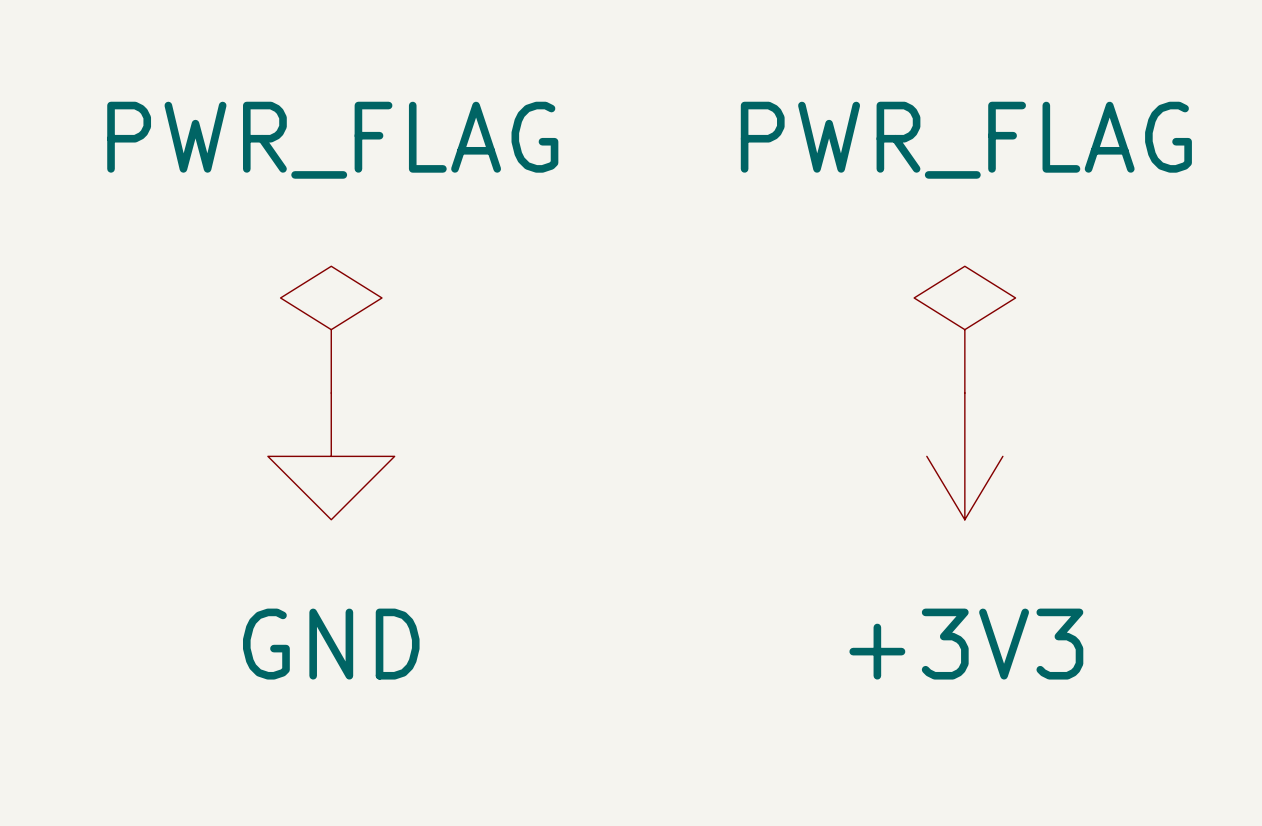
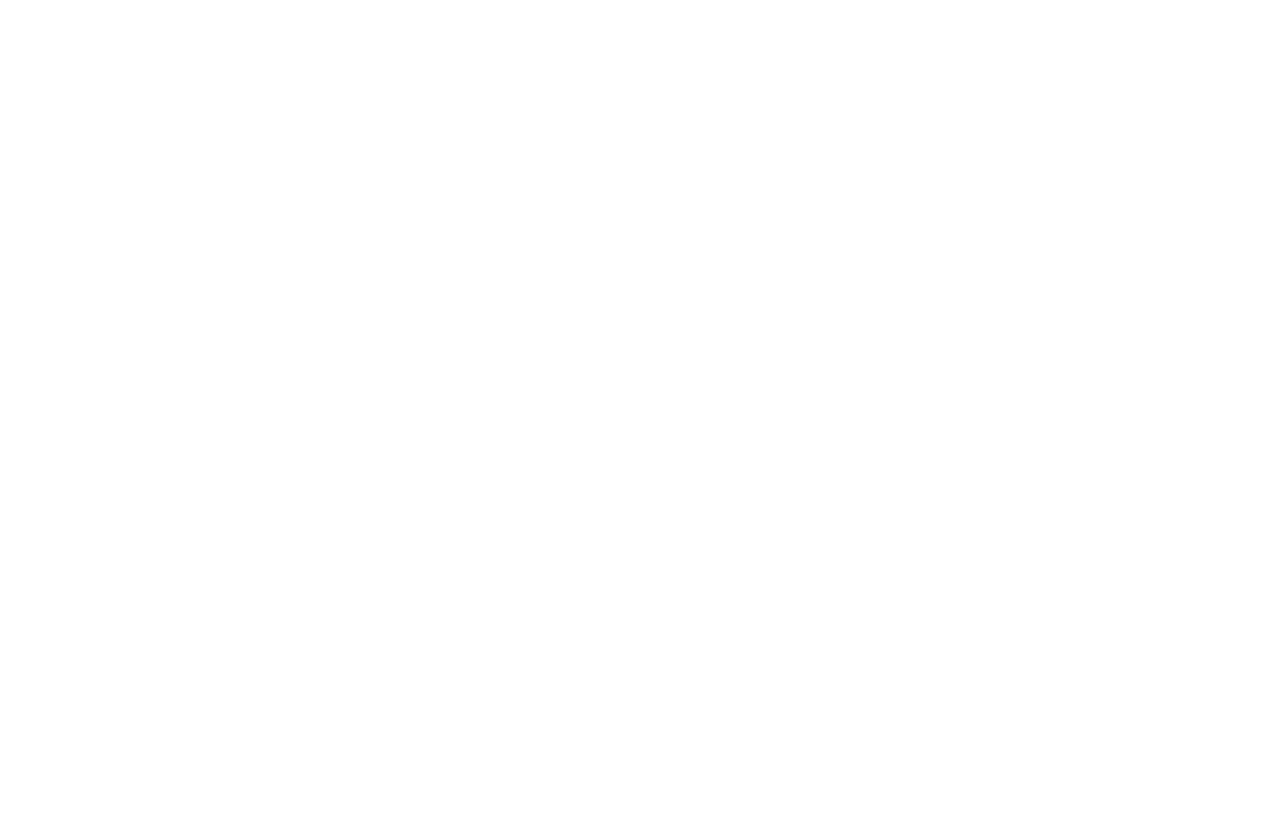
power symbol: PWR_FLAG (331, 329) -> none
power symbol: PWR_FLAG (964, 329) -> none
power symbol: GND (331, 456) -> none
power symbol: +3V3 (964, 456) -> none

